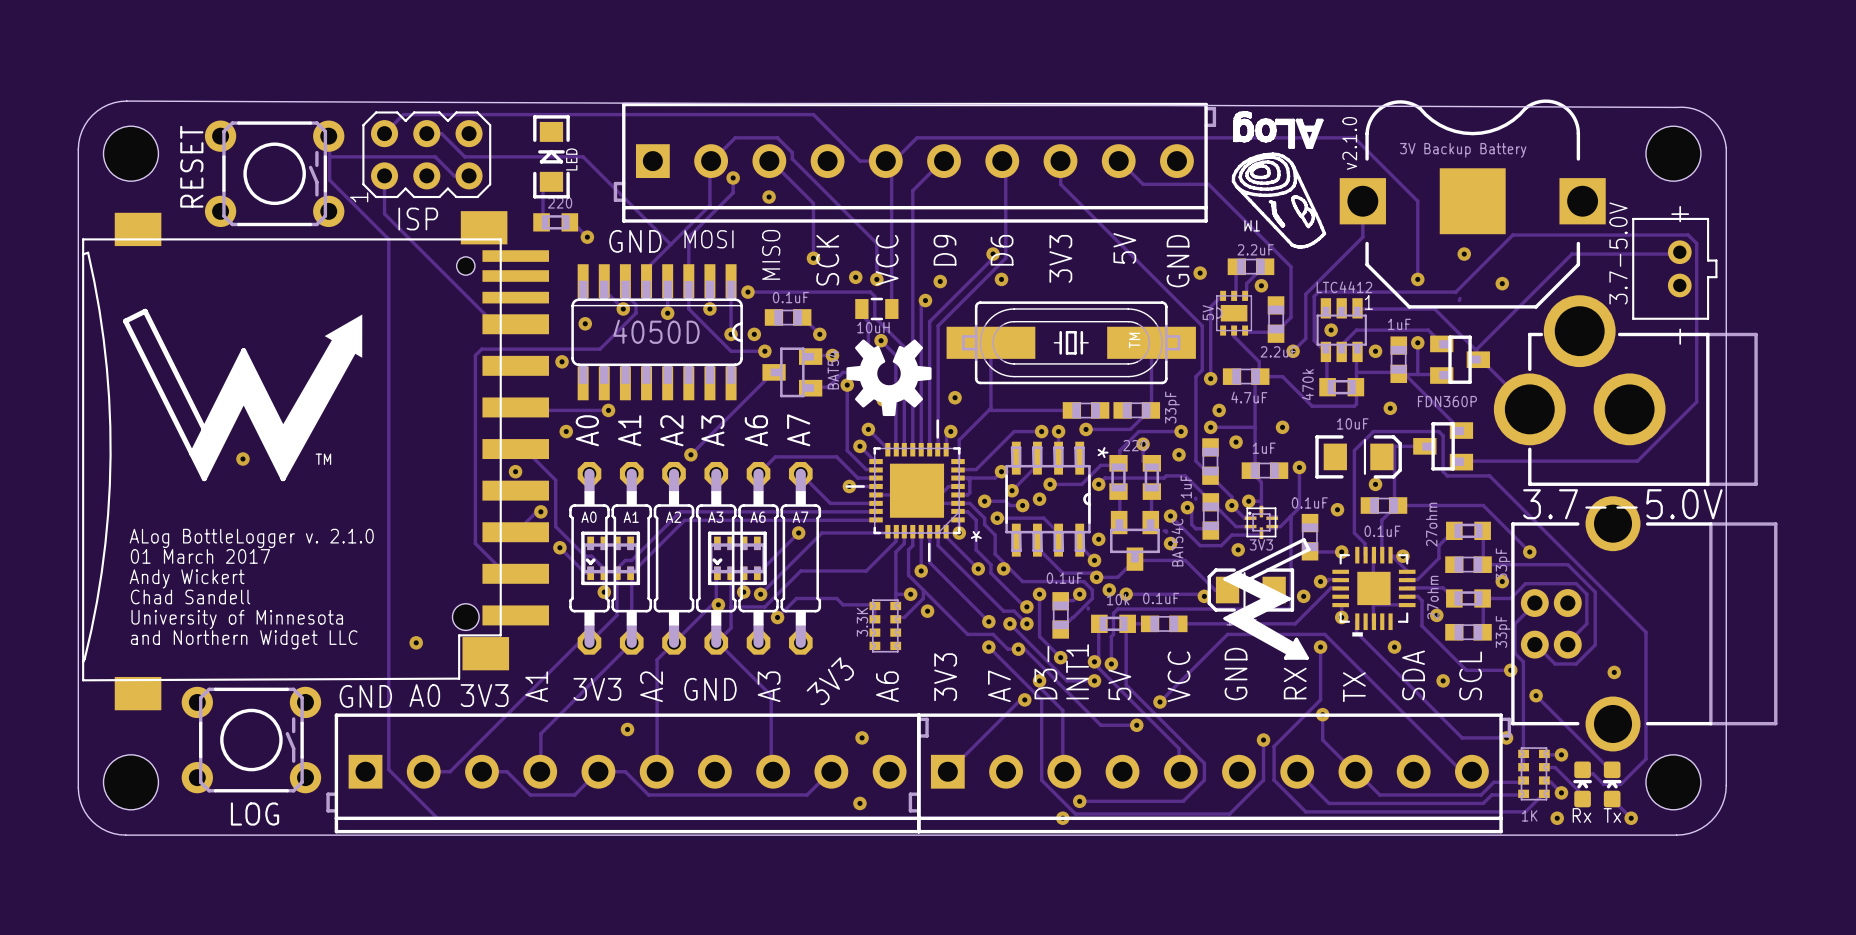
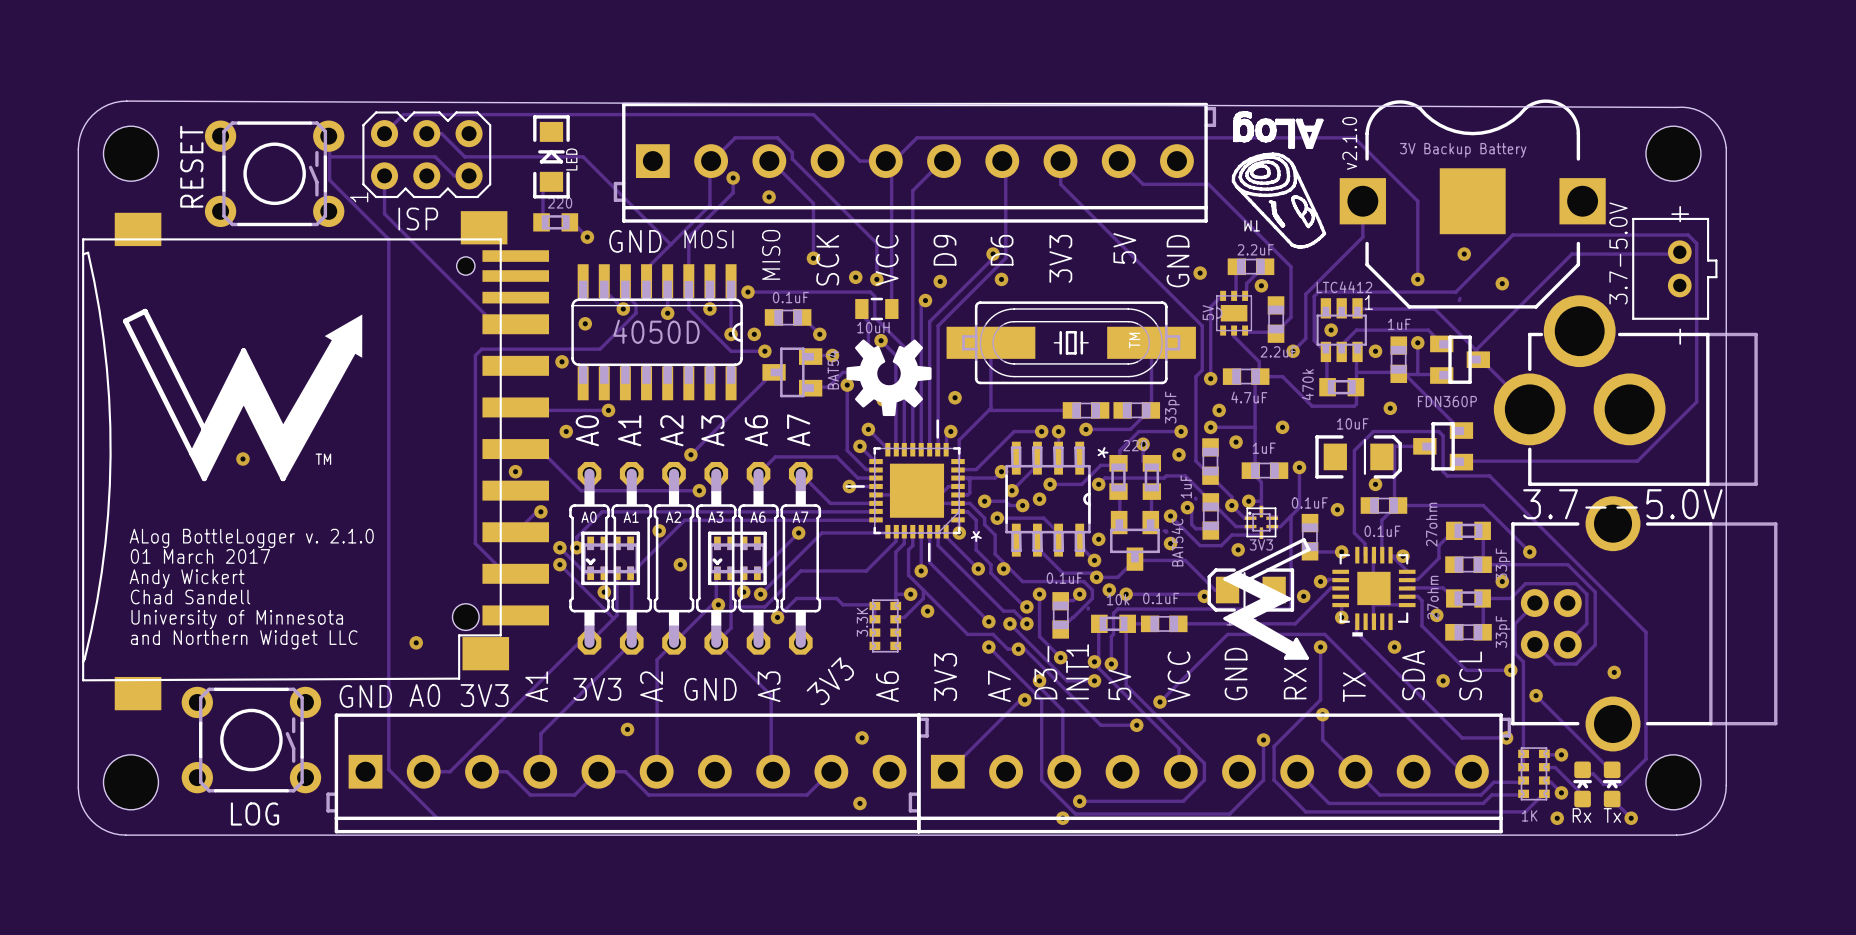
track: (526, 450) (555, 480) (555, 526) (585, 556) (591, 556) (602, 566) (602, 573) (604, 575) -> (526, 450) (540, 450) (581, 490) (699, 490)
via: none -> (699, 490)
track: (680, 511) (631, 560) (625, 560) (619, 566) (619, 573) (616, 575) -> (680, 511) (602, 511) (576, 537) (576, 547)
via: none -> (659, 530)
via: none -> (576, 547)
track: none -> (559, 564) (613, 618)
via: none -> (559, 564)
via: none -> (680, 564)

